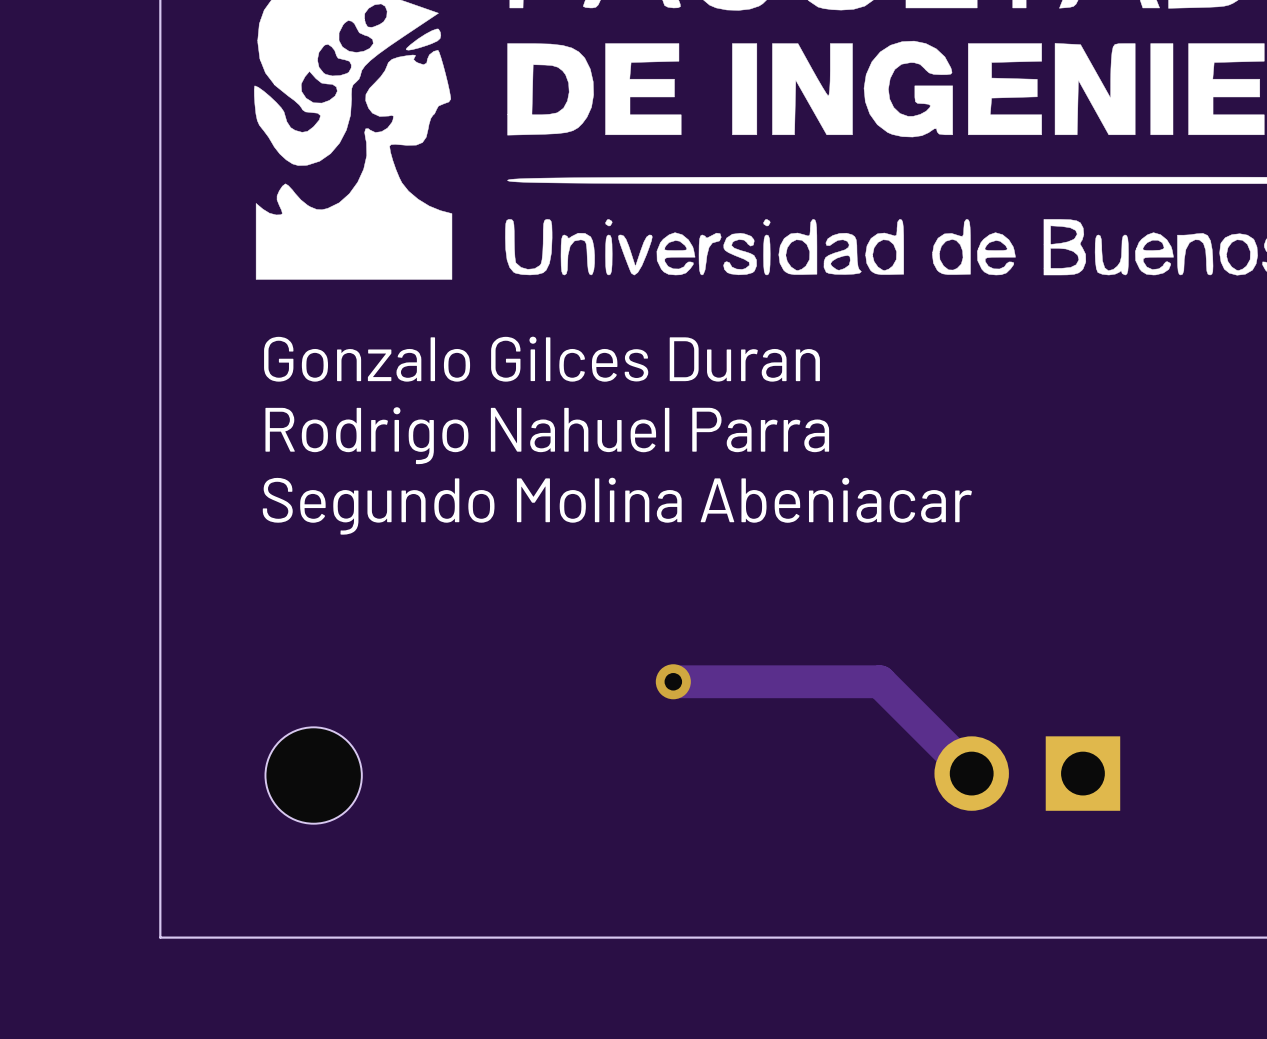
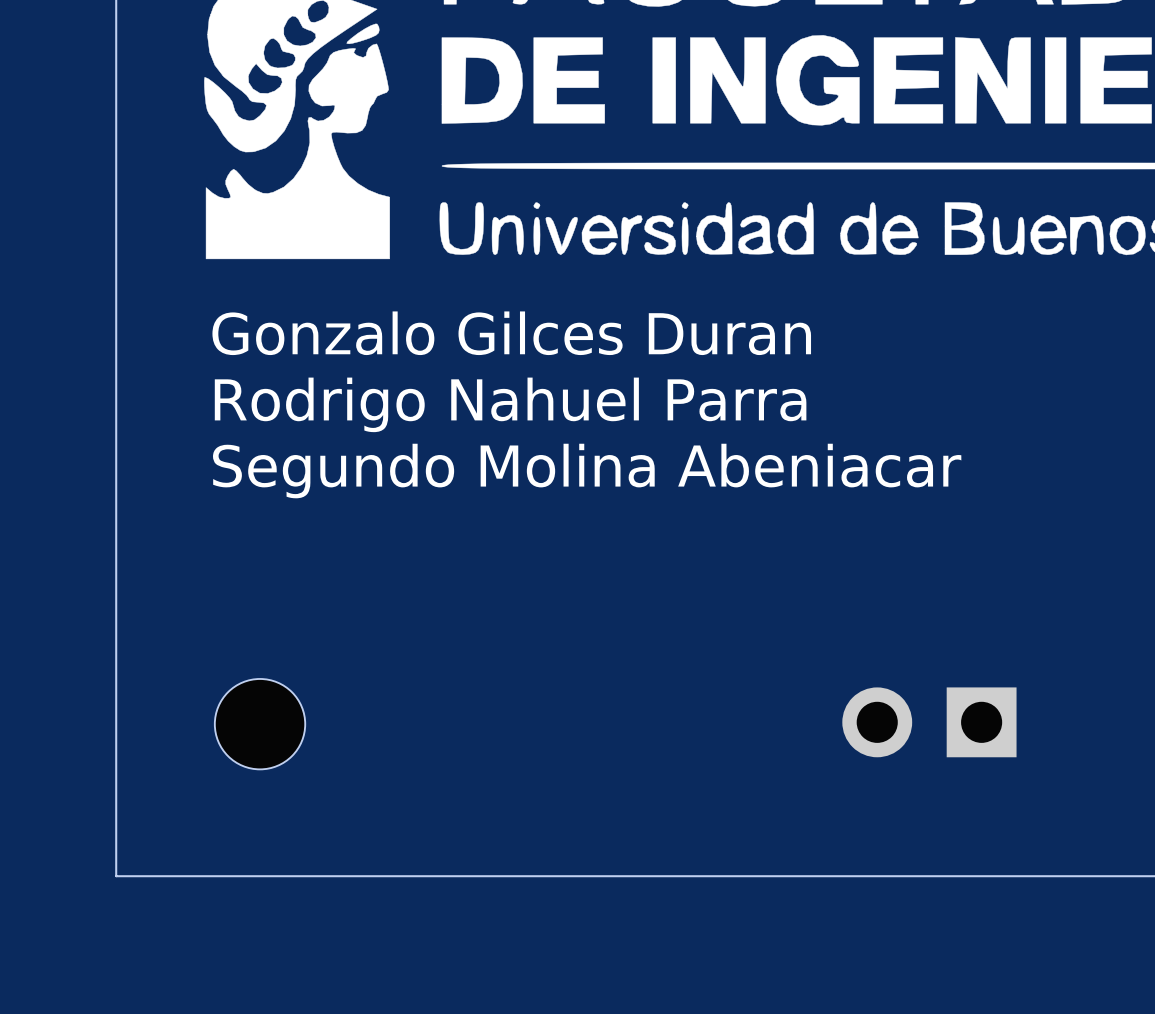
track: (673, 681) (879, 681) (971, 773) -> none
via: (673, 681) -> none

